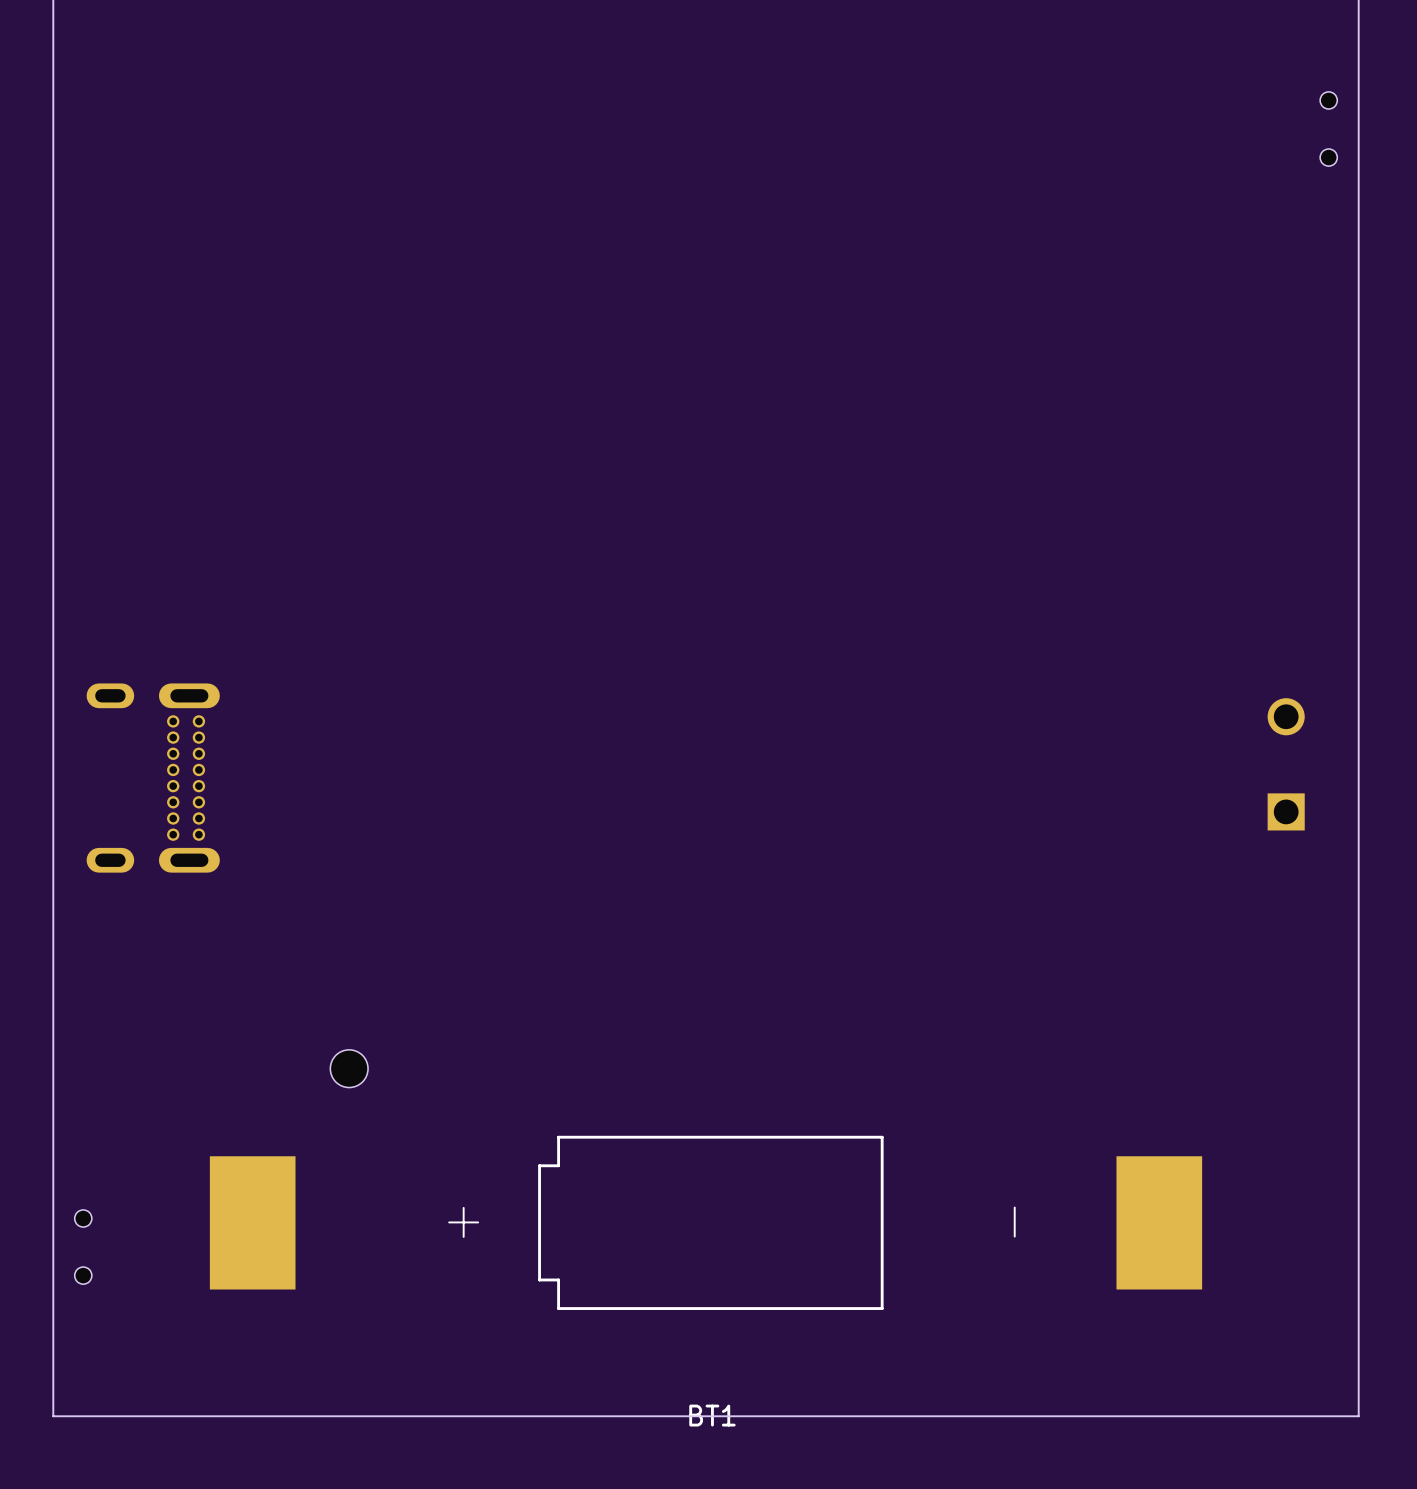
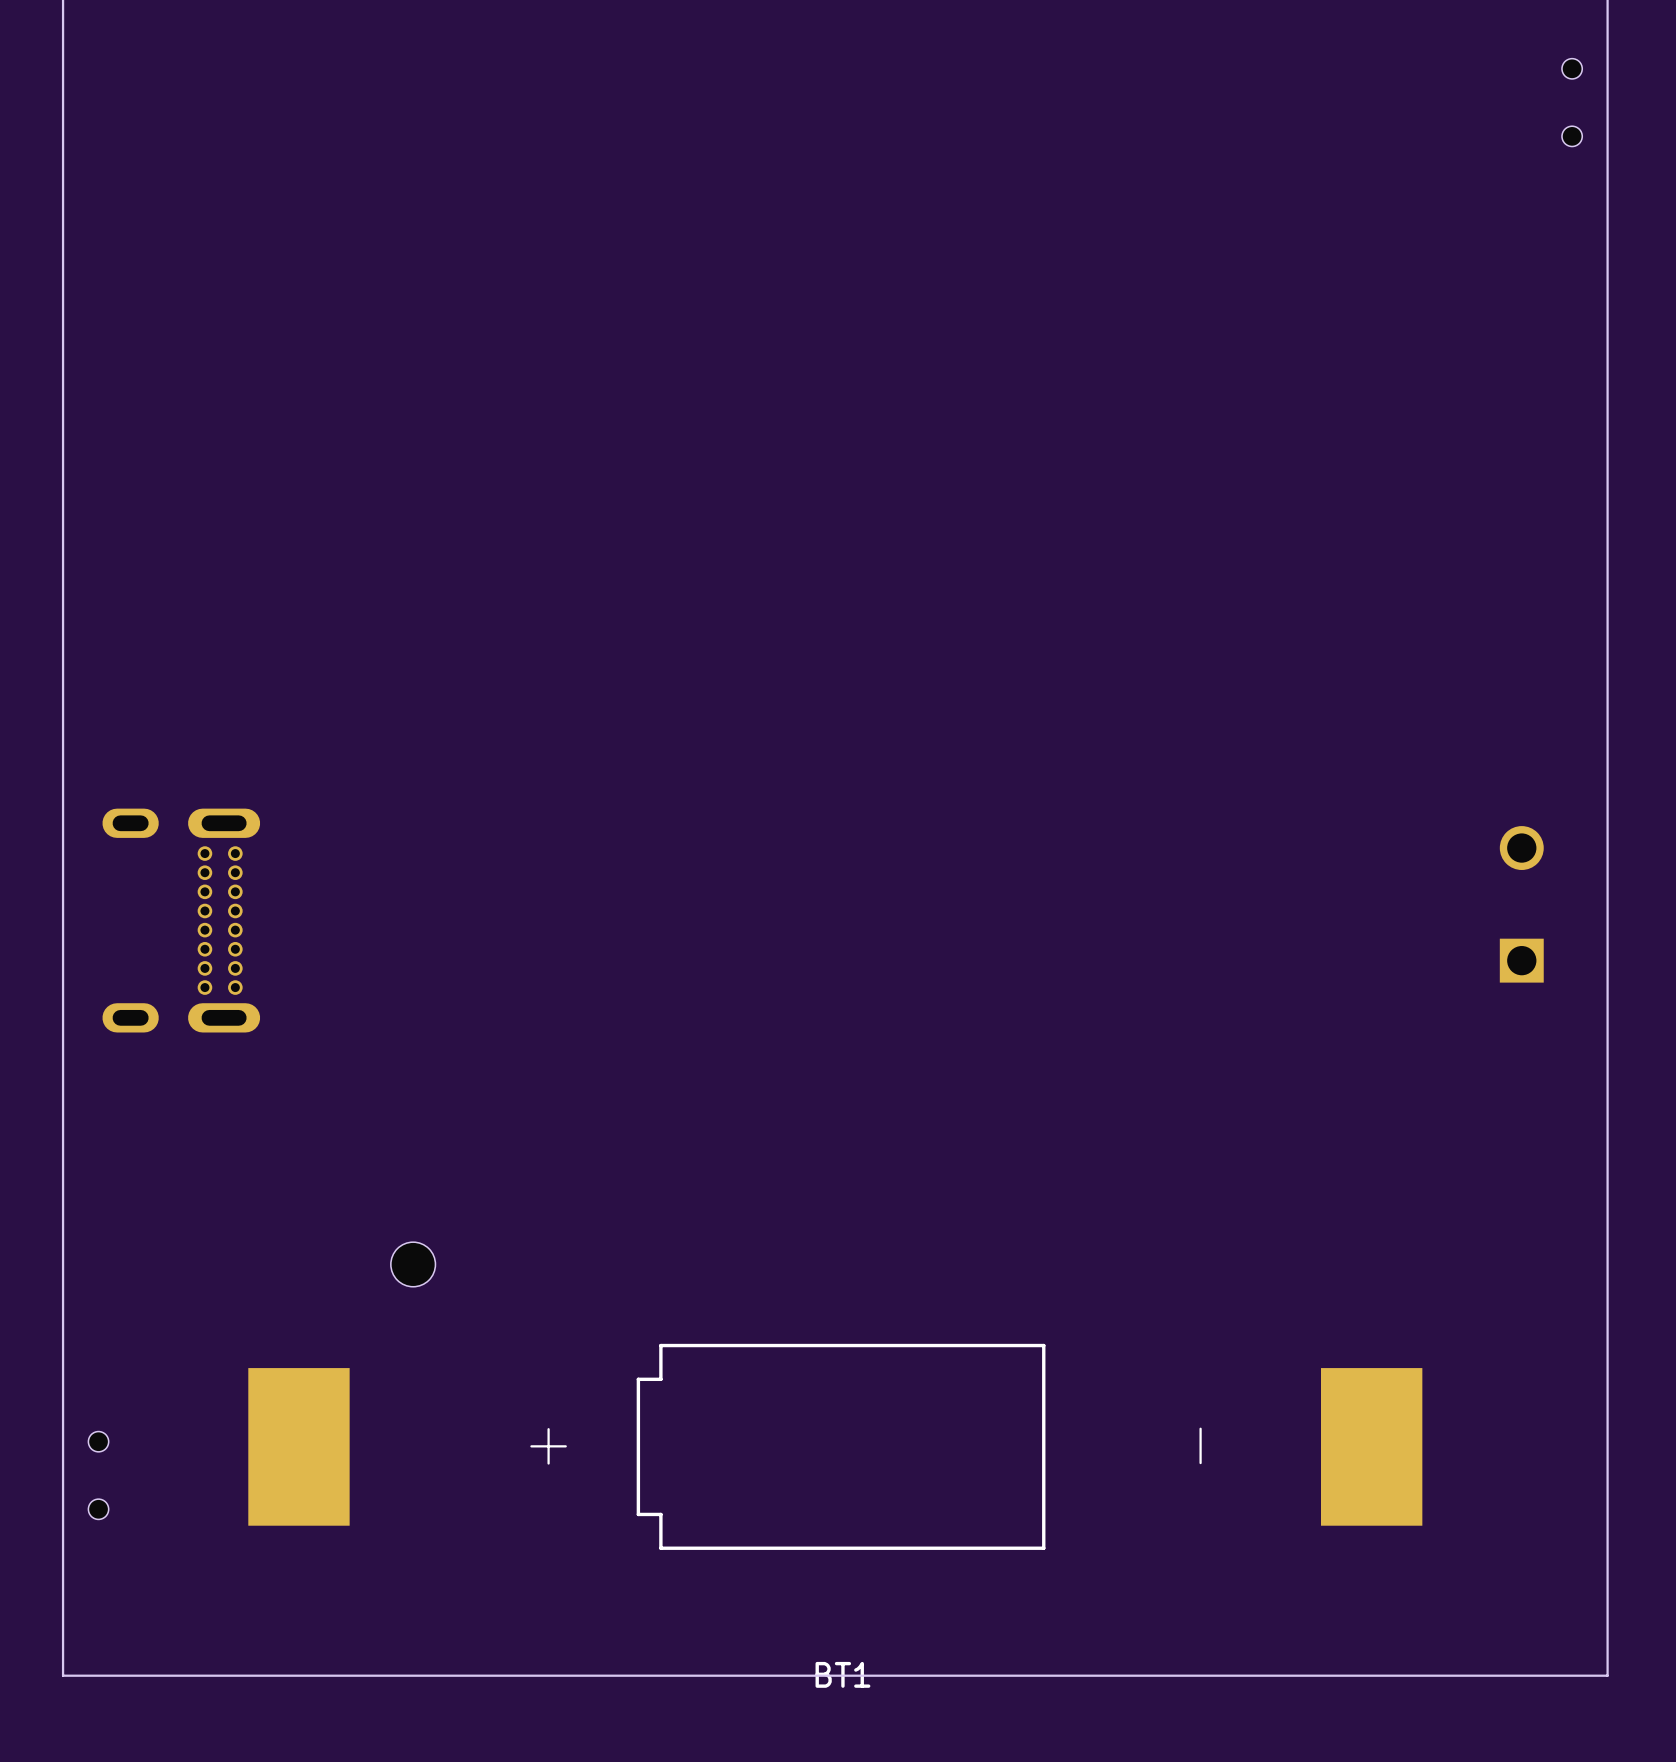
part position: (1328, 129) -> (1572, 102)

